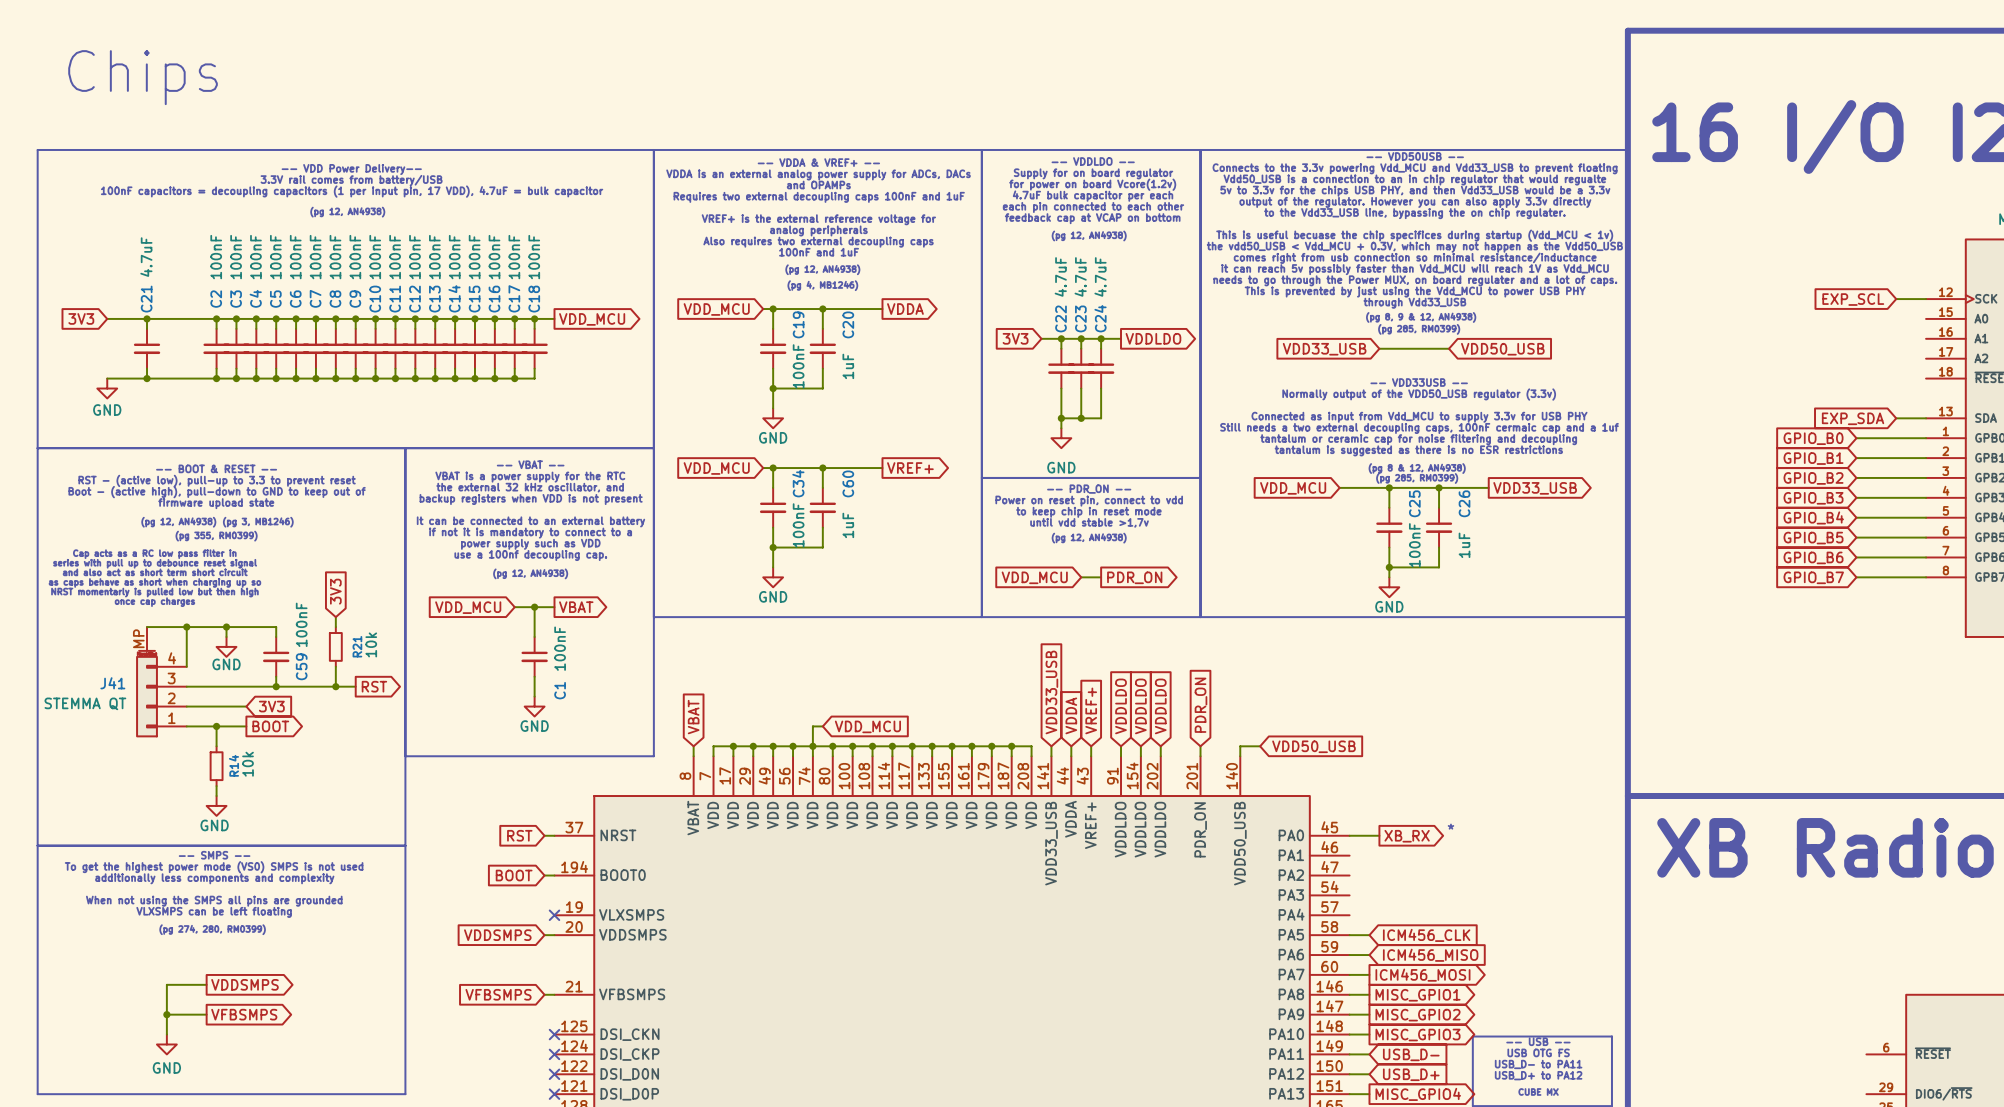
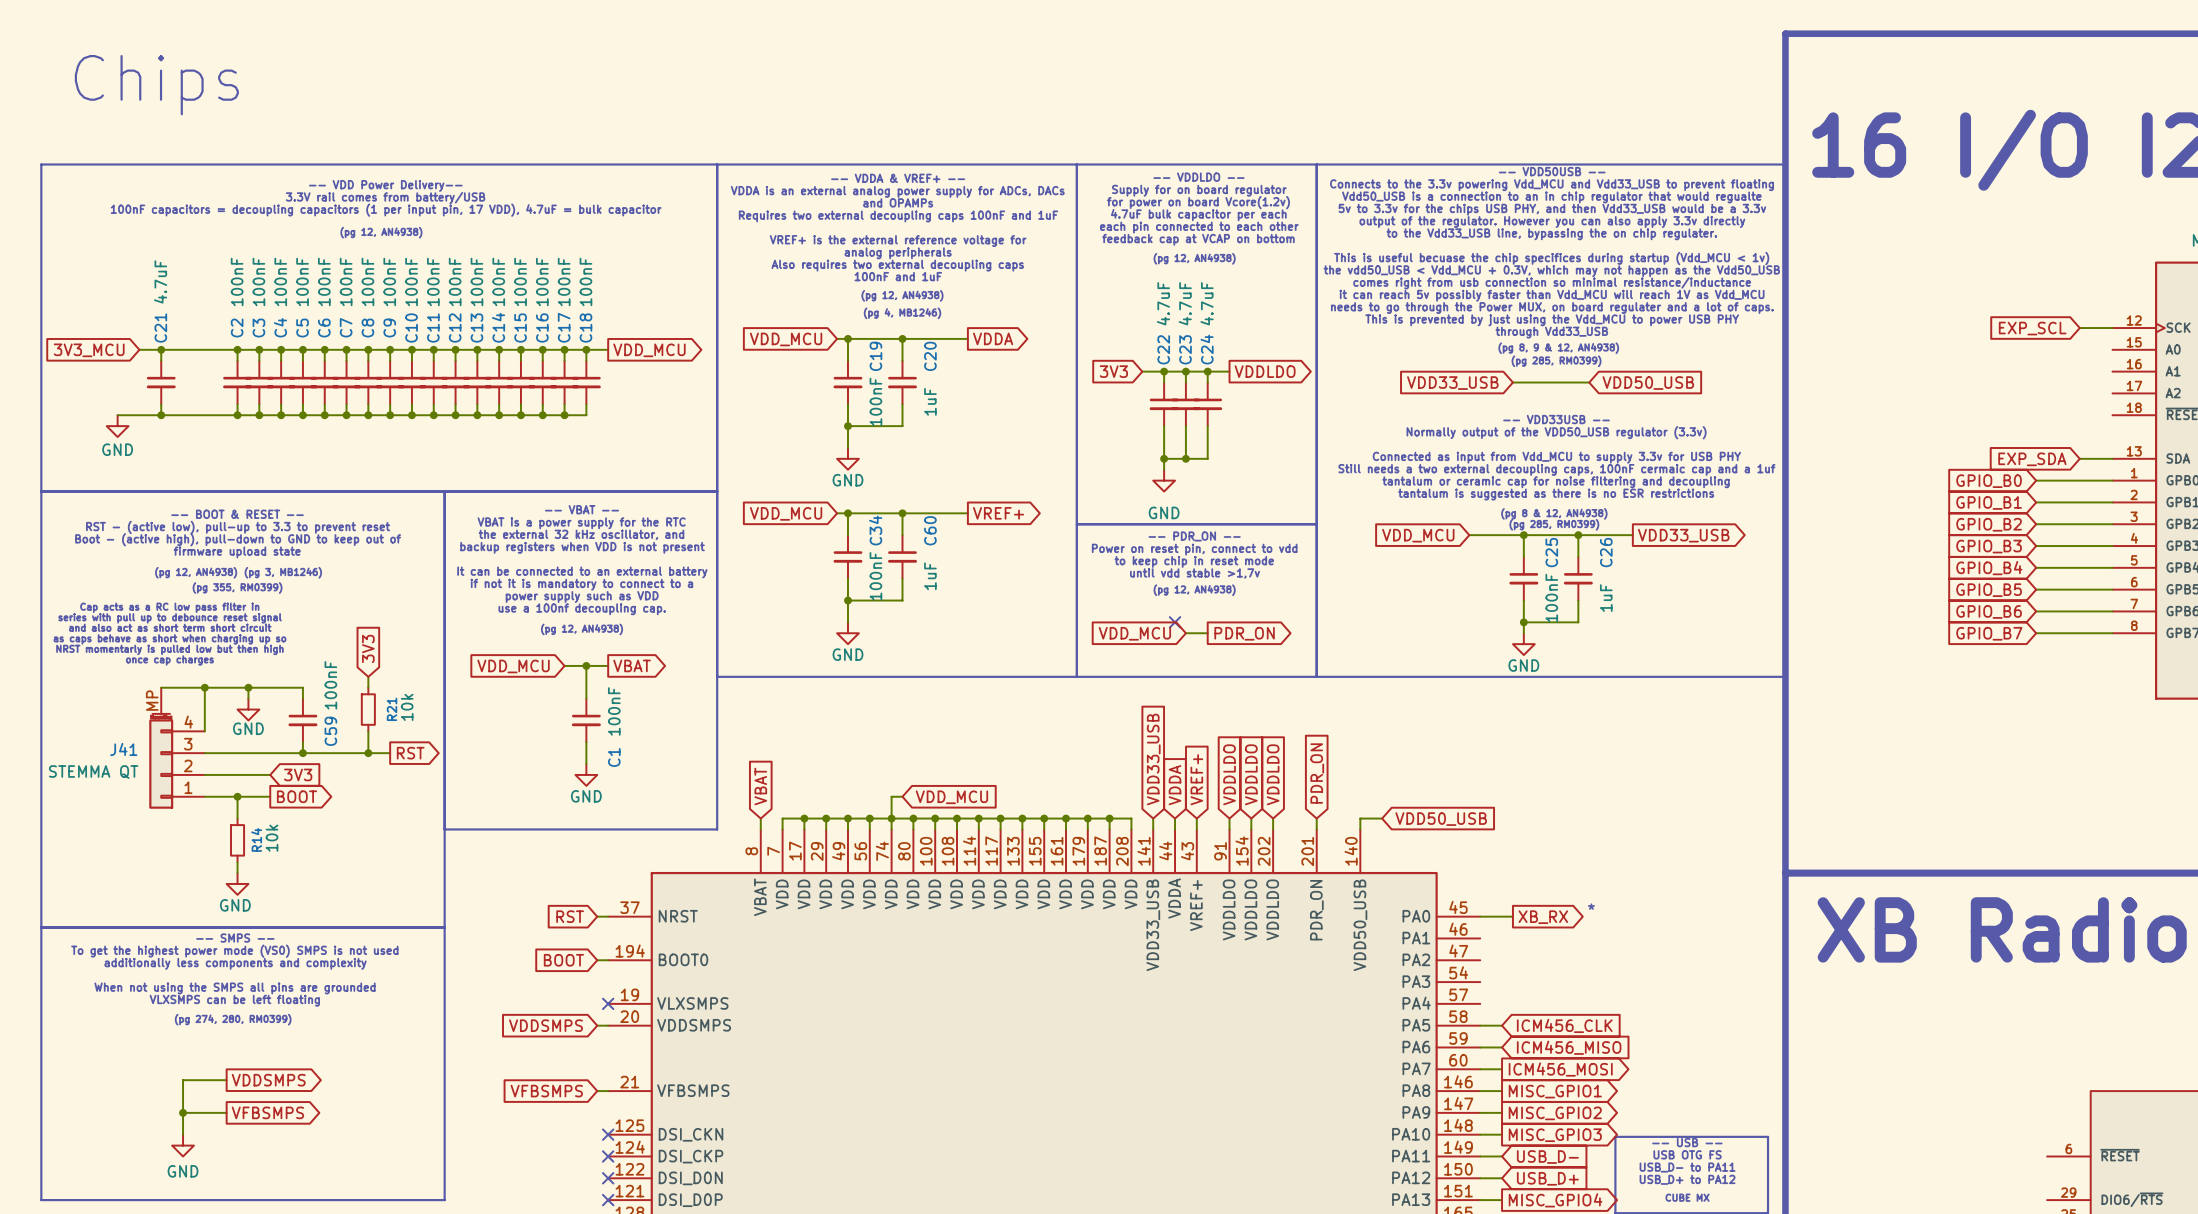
global label: 3V3 (81, 318) -> none
wire: (107, 318) (127, 318) -> none
global label: none -> 3V3_MCU (89, 350)
no-connect mark: none -> (1175, 622)

